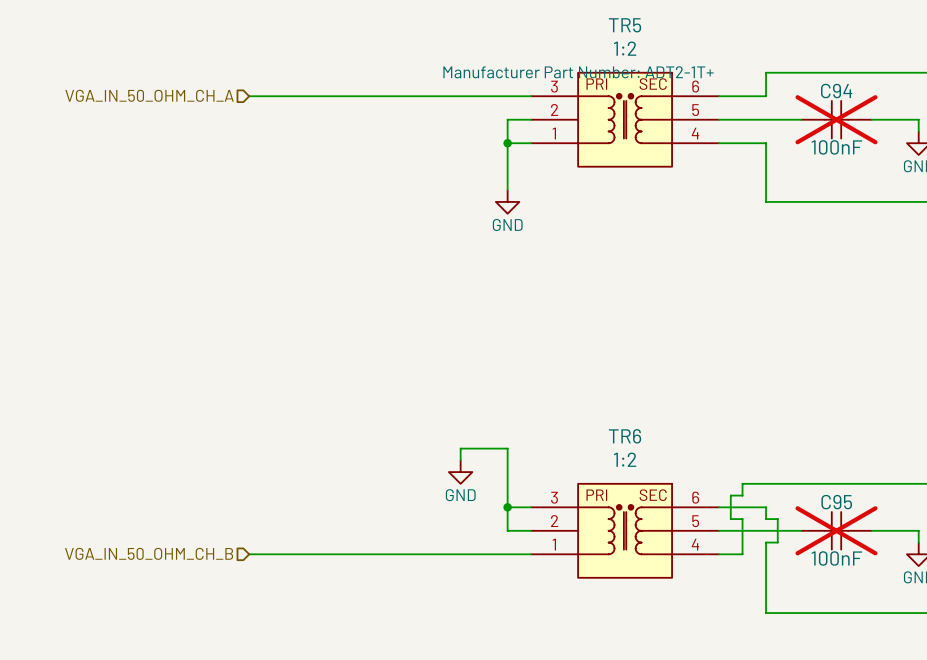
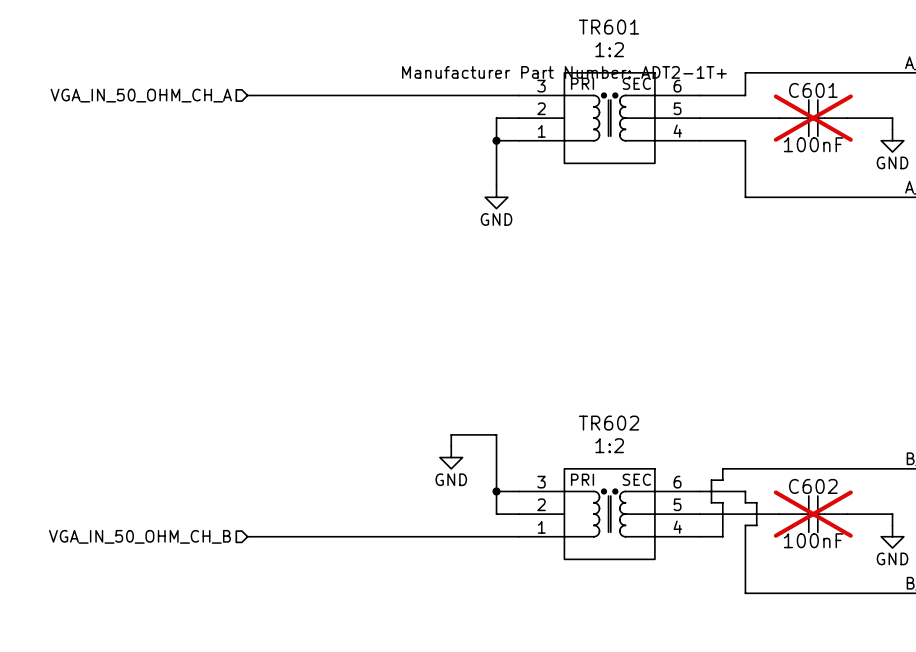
TR5 name: TR5 (625, 25) -> TR601 (609, 27)
C94 name: C94 (836, 91) -> C601 (813, 90)
TR6 name: TR6 (625, 436) -> TR602 (609, 423)
C95 name: C95 (836, 502) -> C602 (813, 486)

